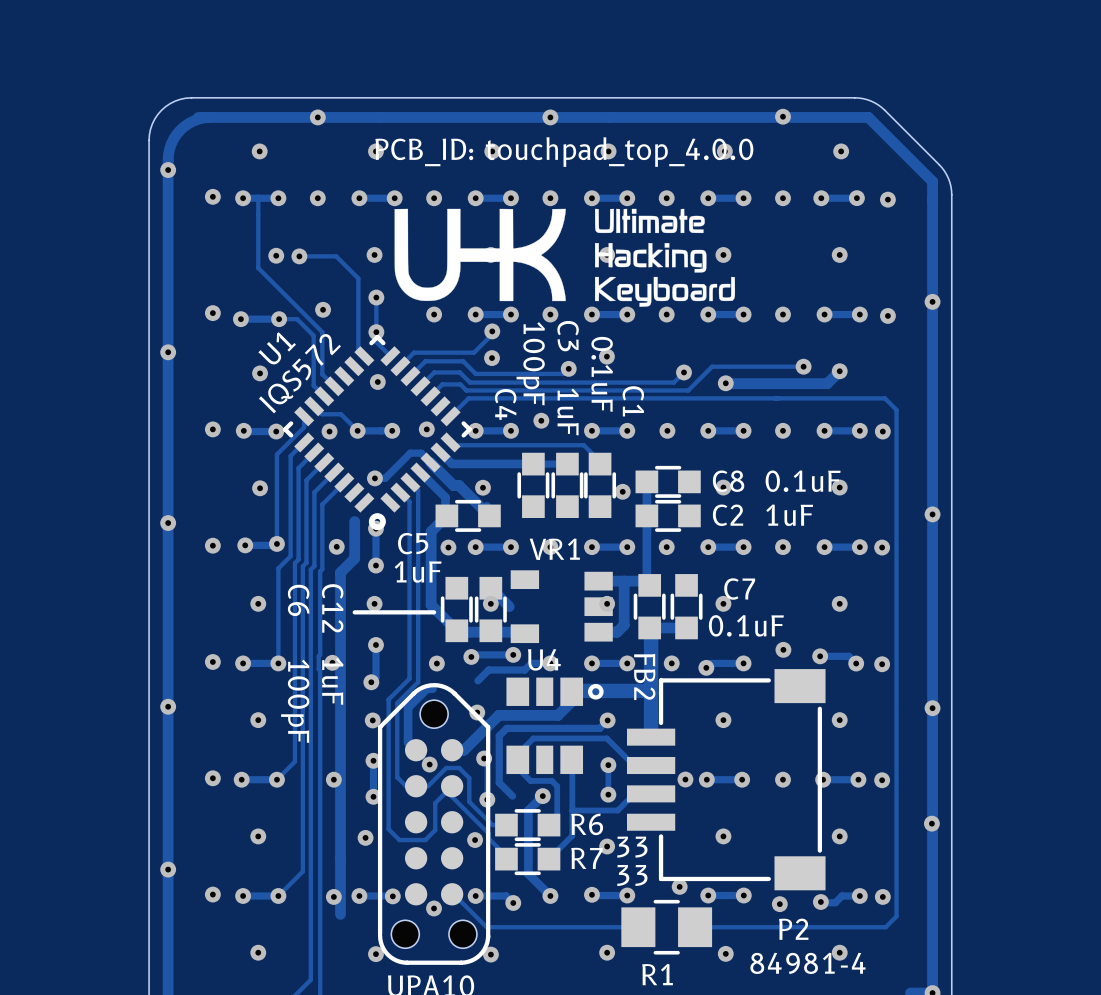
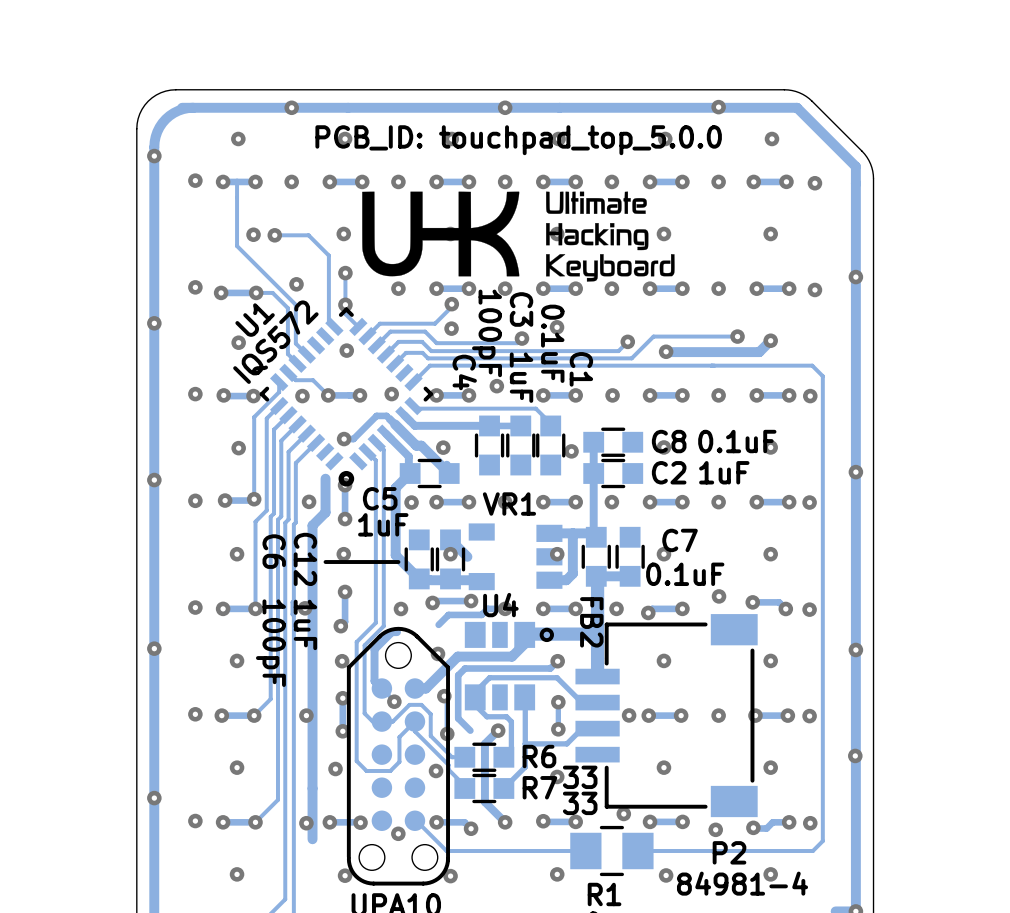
text: PCB_ID: touchpad_top_4.0.0 (564, 152) -> PCB_ID: touchpad_top_5.0.0 (518, 140)

